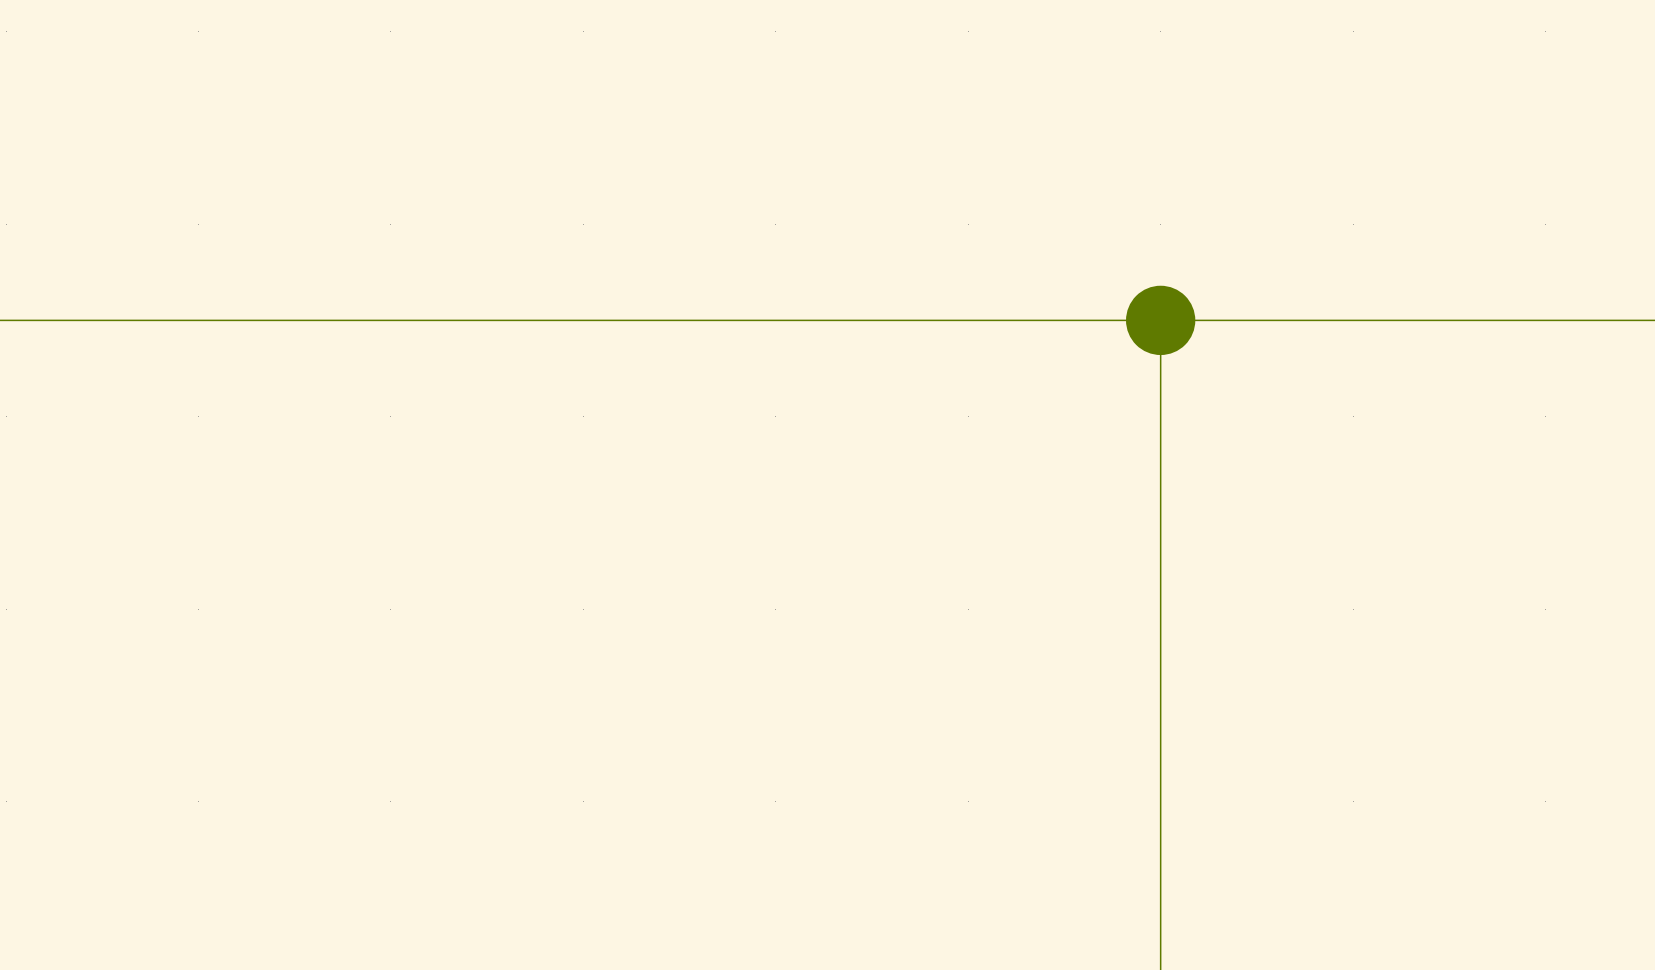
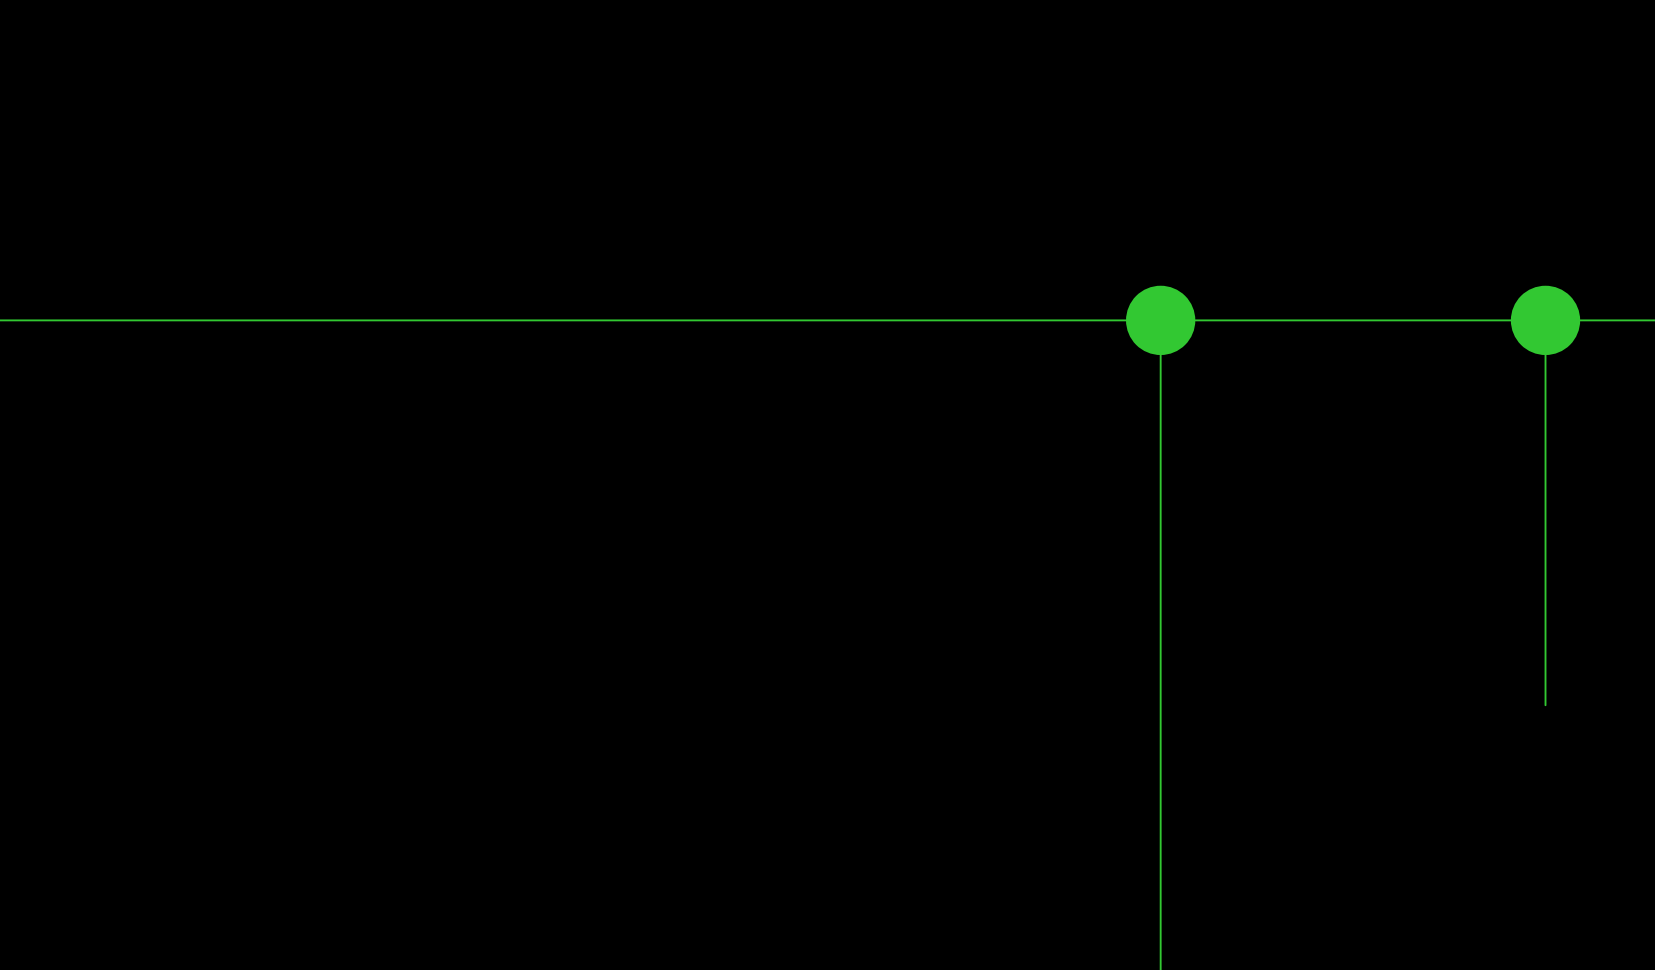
wire: none -> (1545, 320) (1545, 705)
junction: none -> (1545, 320)

